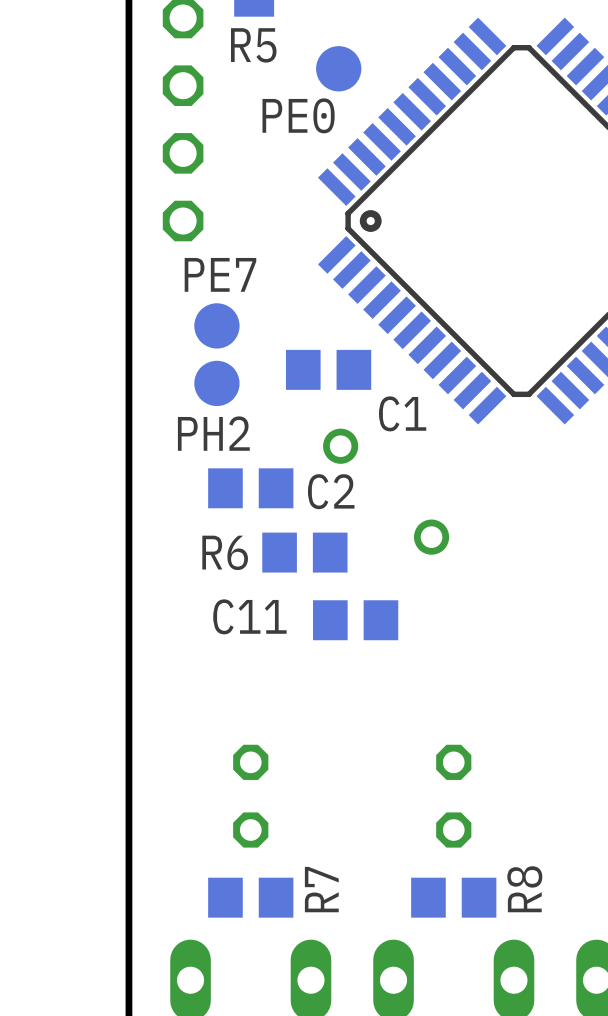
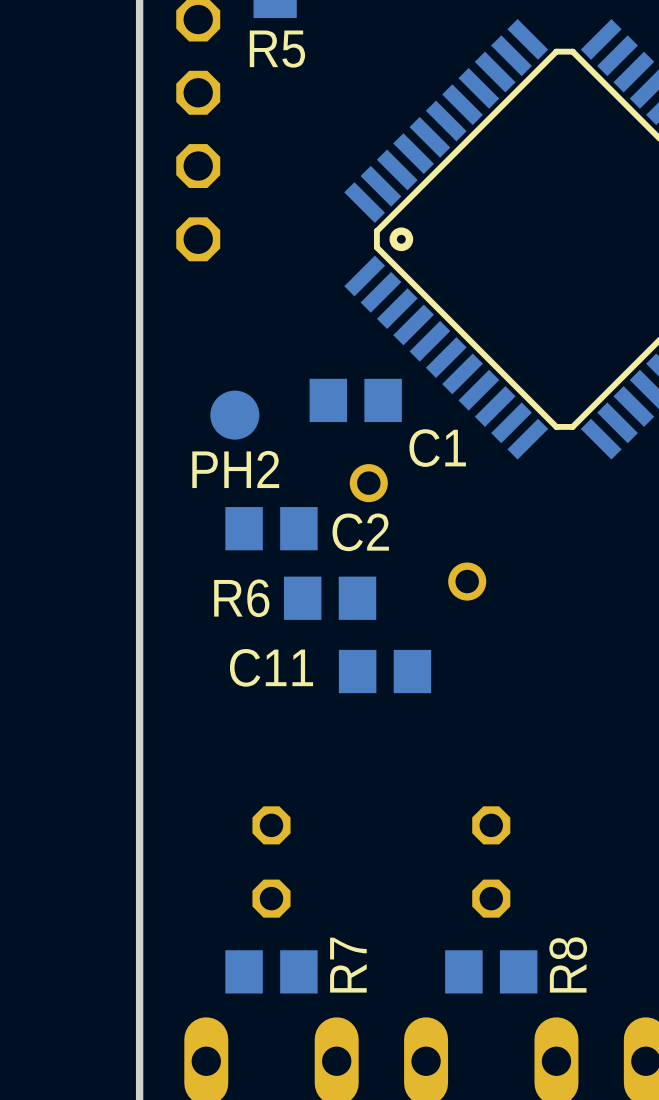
PE0: (338, 68) -> none
PE7: (216, 325) -> none

